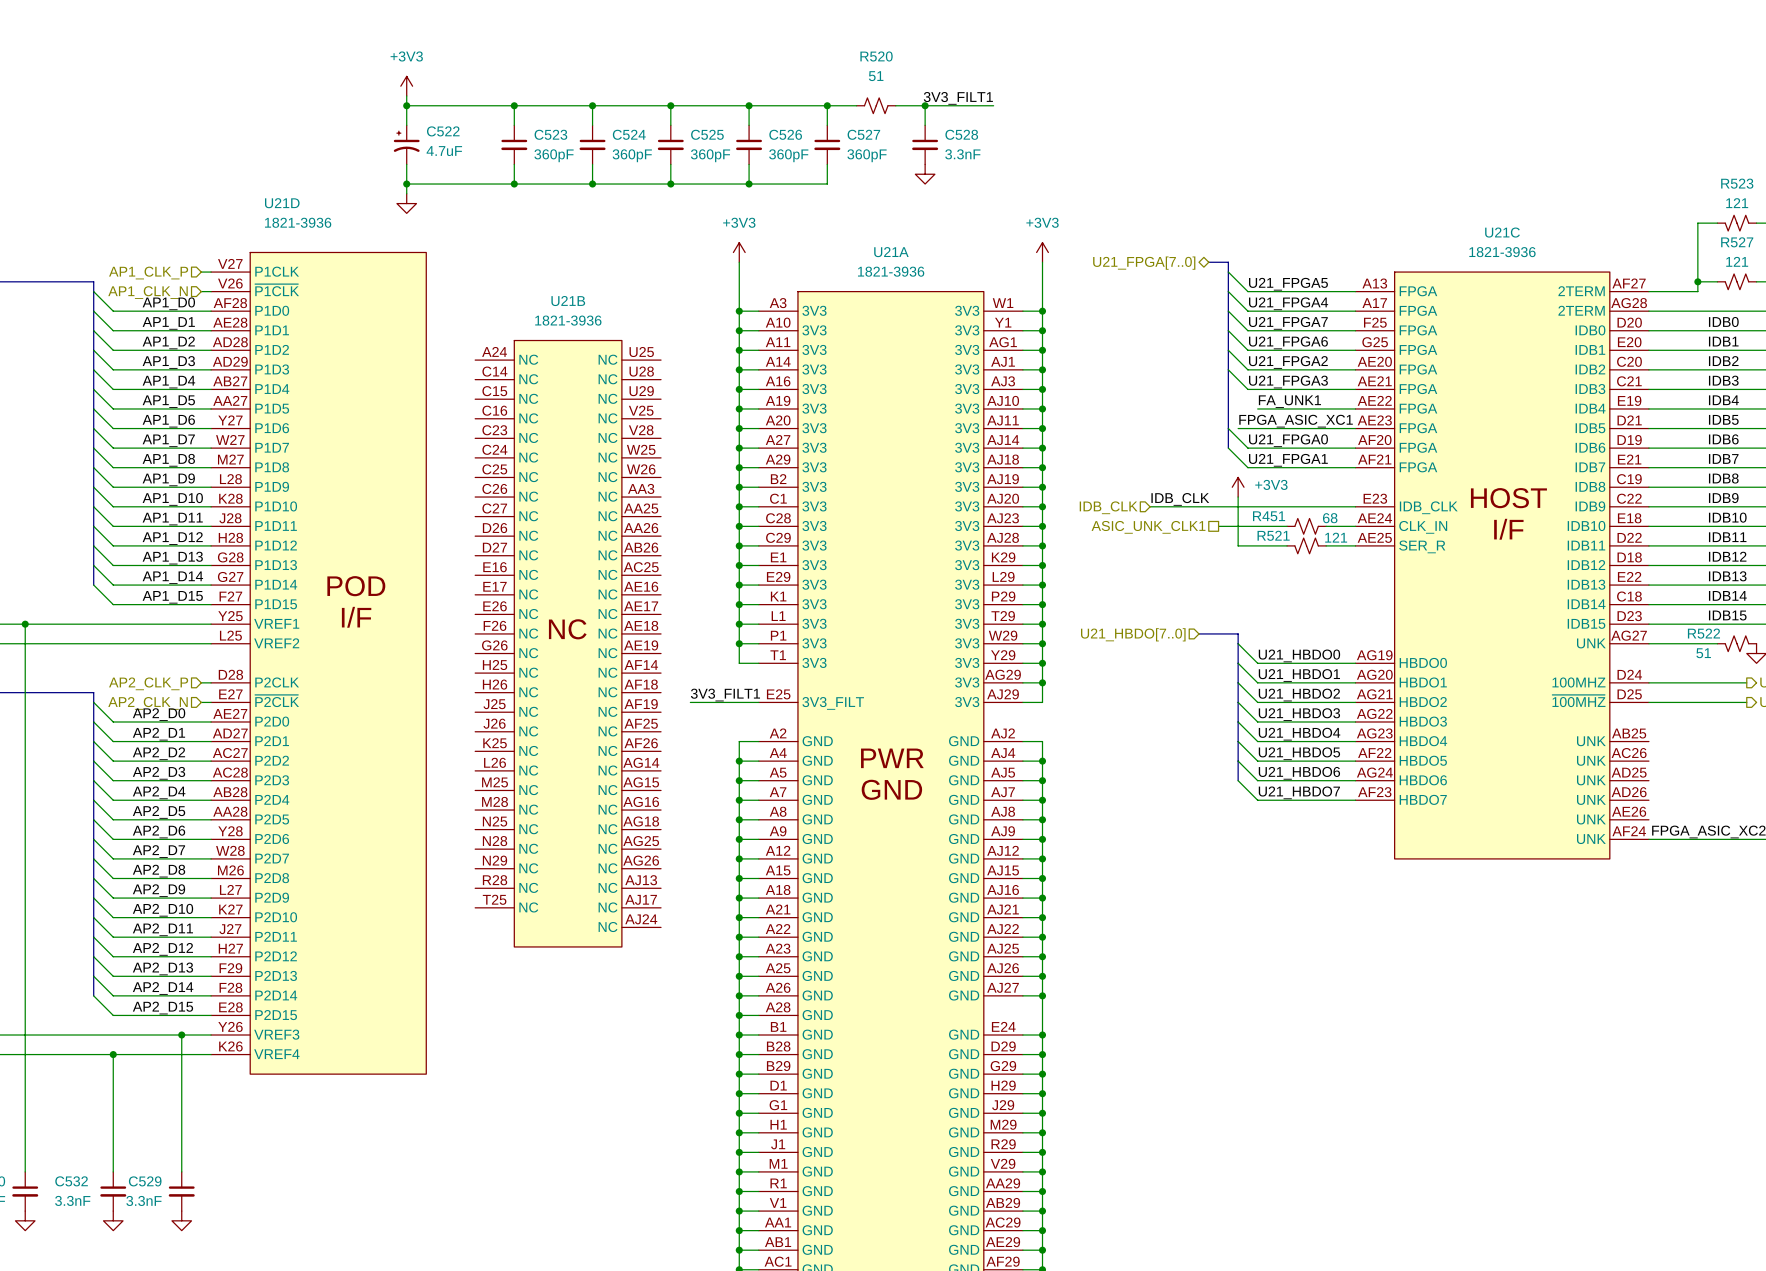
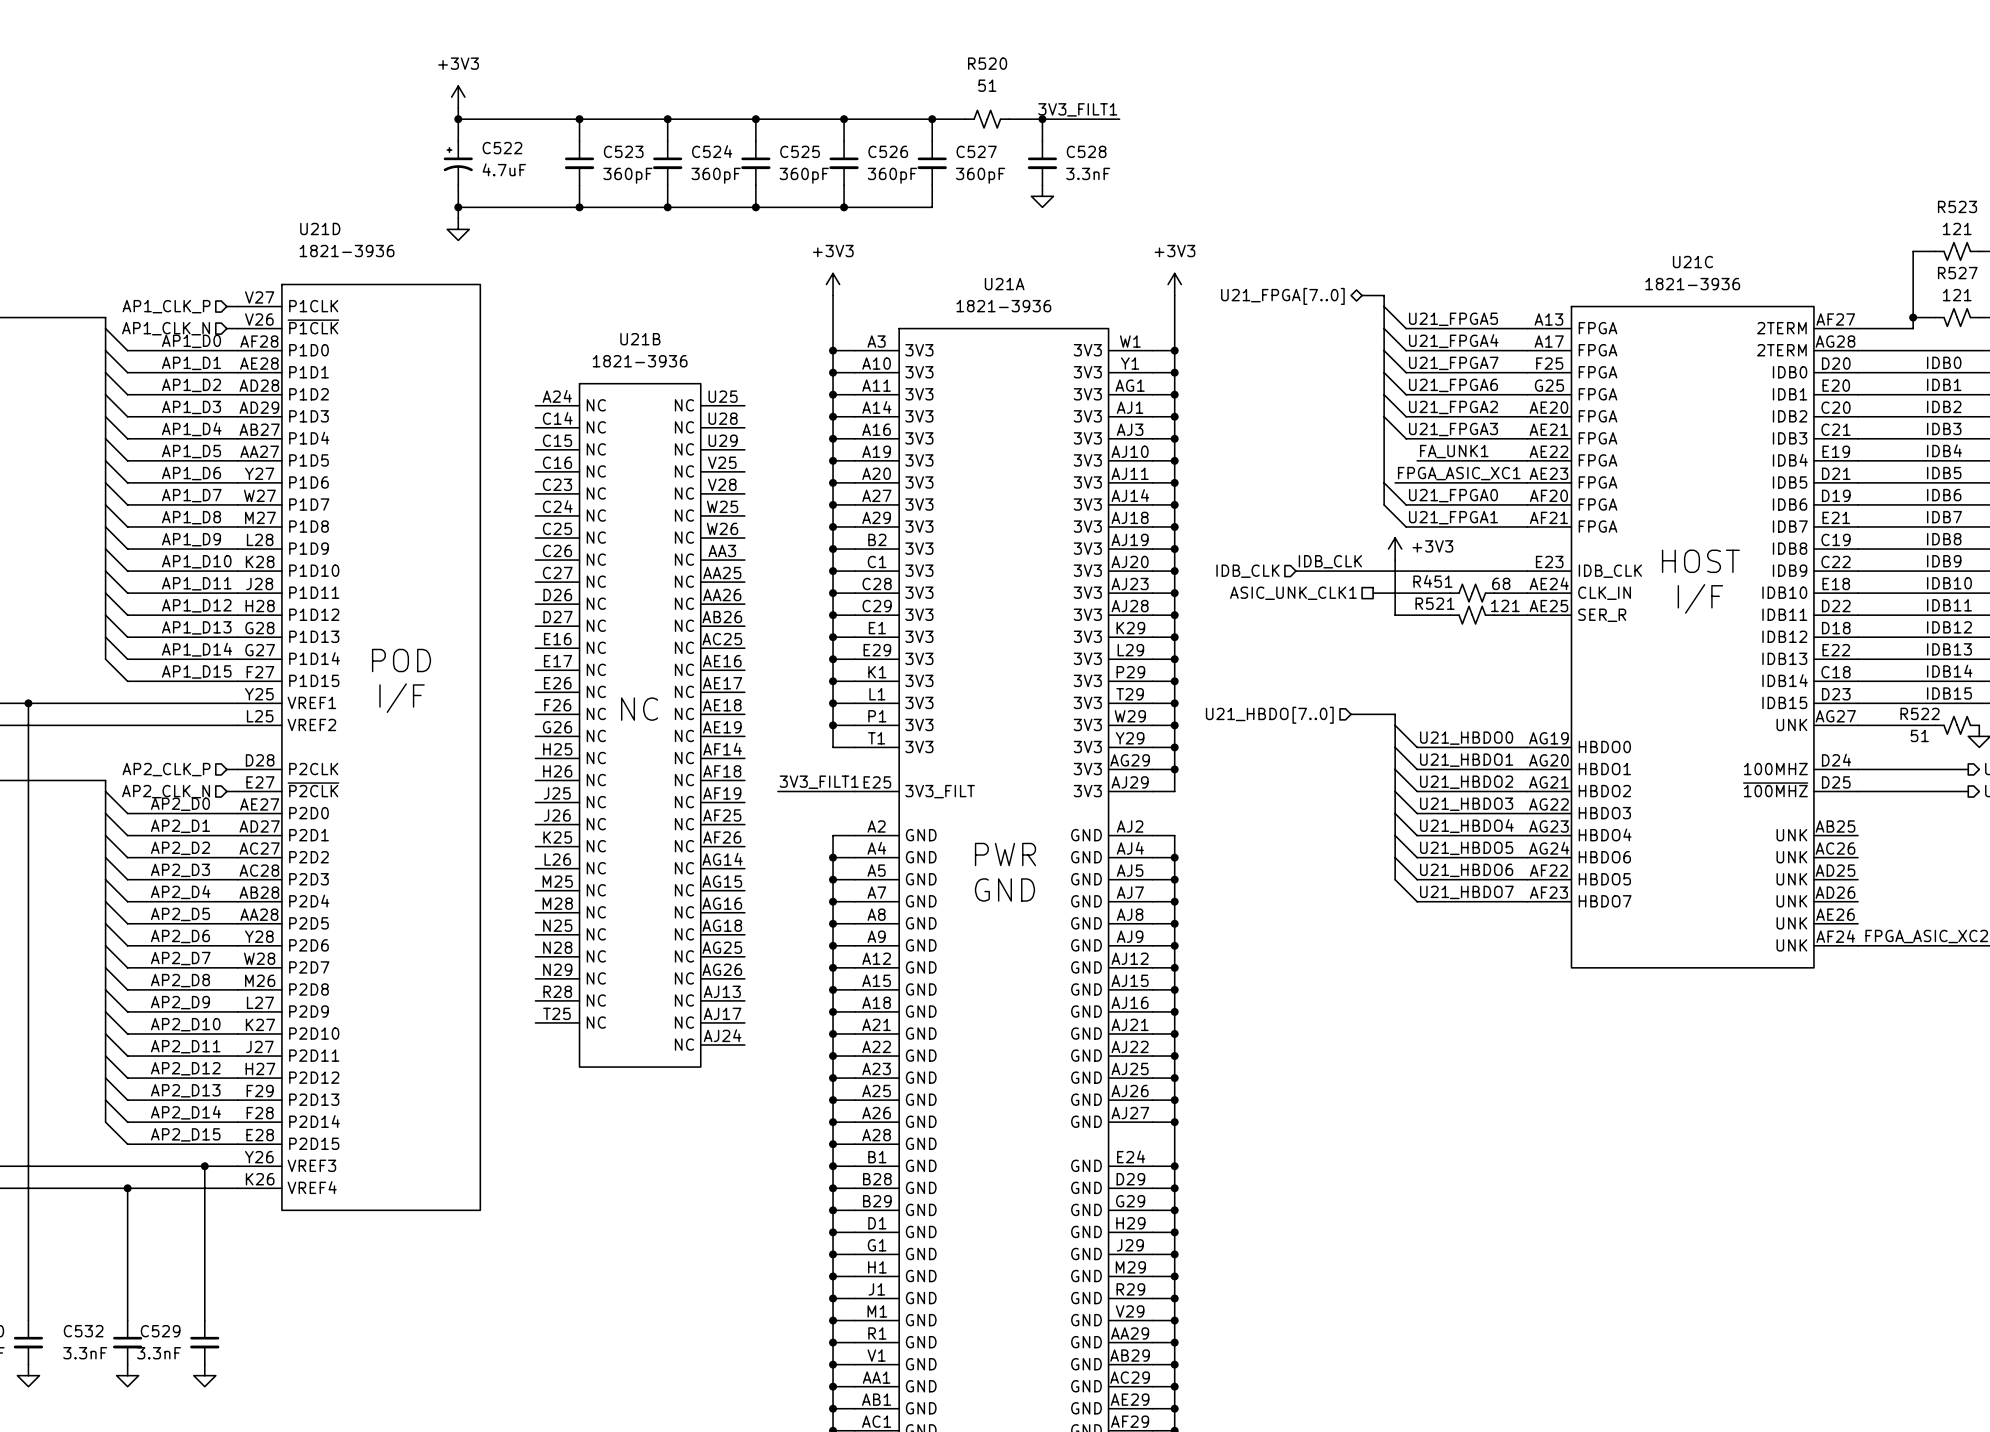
U21C pin number: AF22 (1374, 752) -> AG24 (1549, 848)
U21C pin name: HBDO5 (1423, 760) -> HBDO6 (1604, 857)
U21C pin number: AG24 (1374, 772) -> AF22 (1548, 870)
U21C pin name: HBDO6 (1423, 780) -> HBDO5 (1604, 879)

